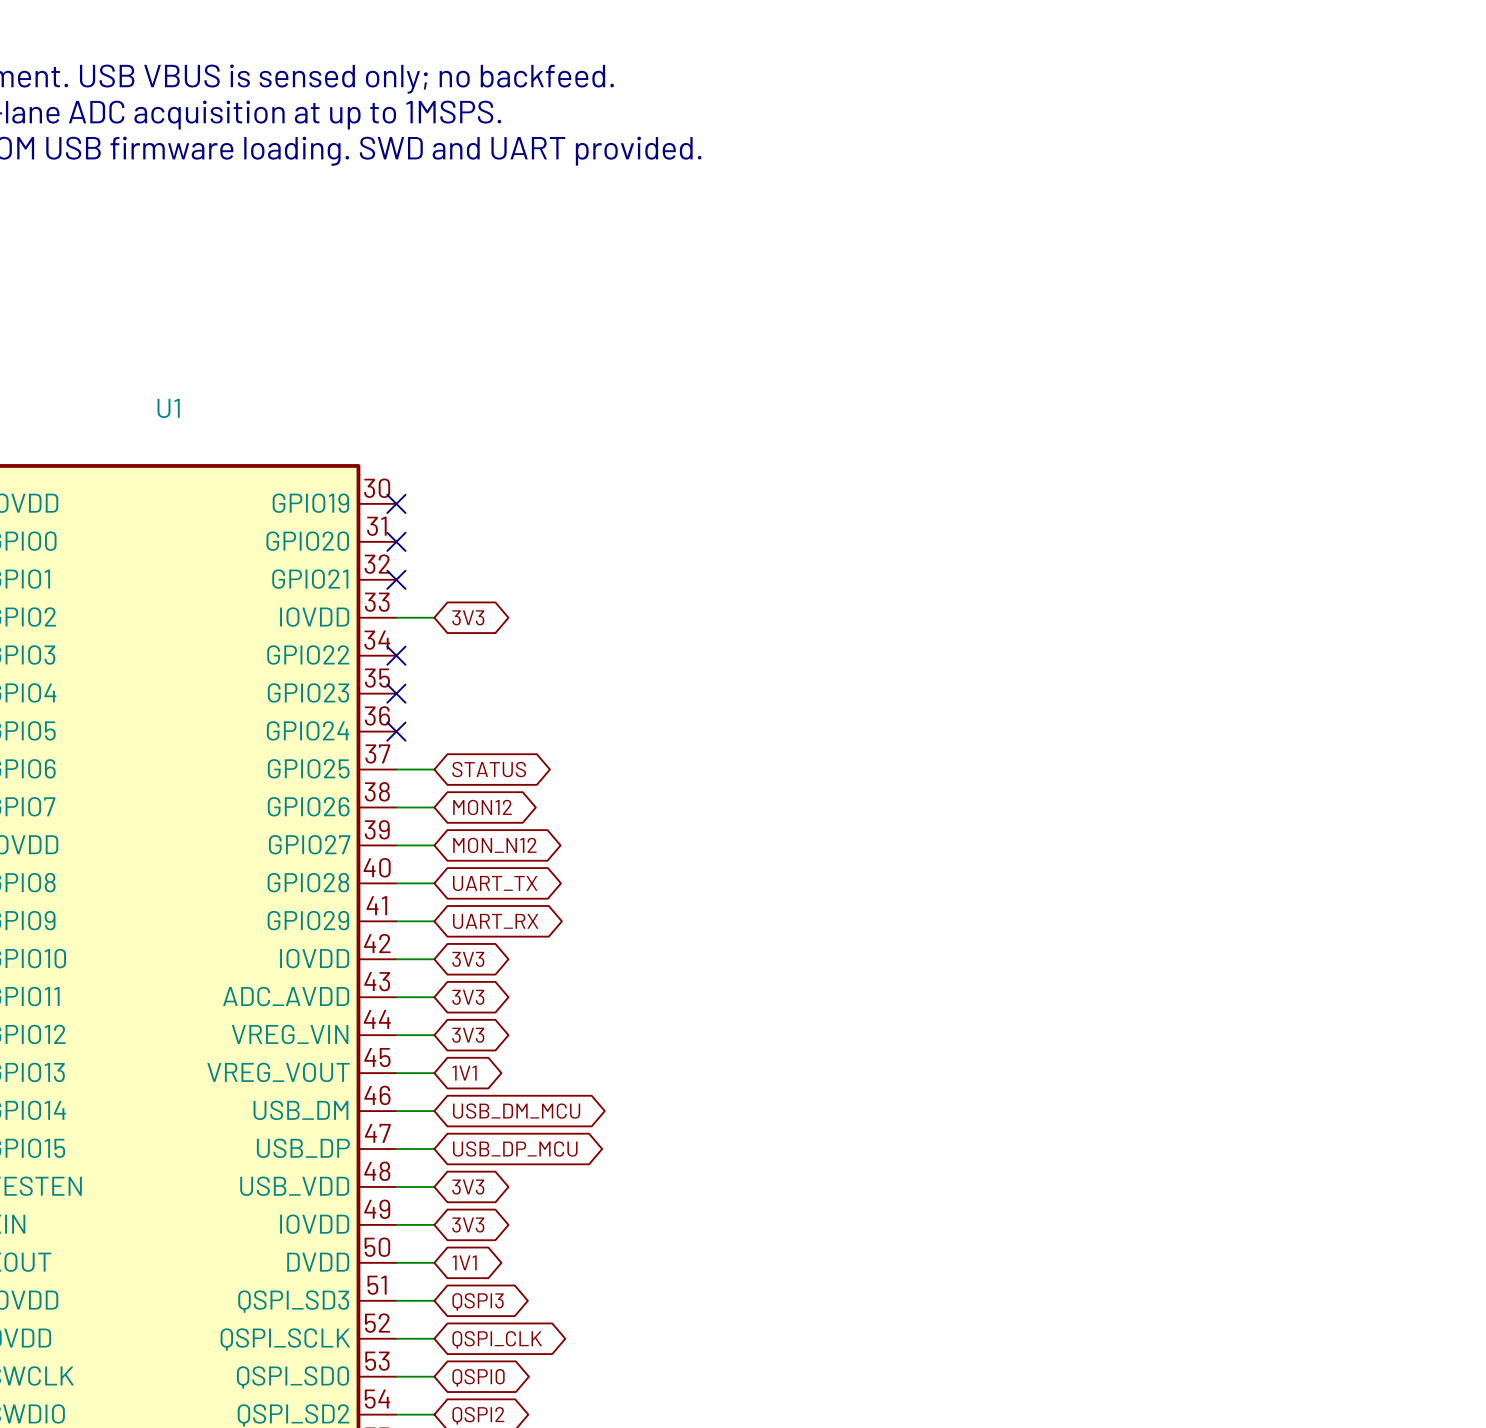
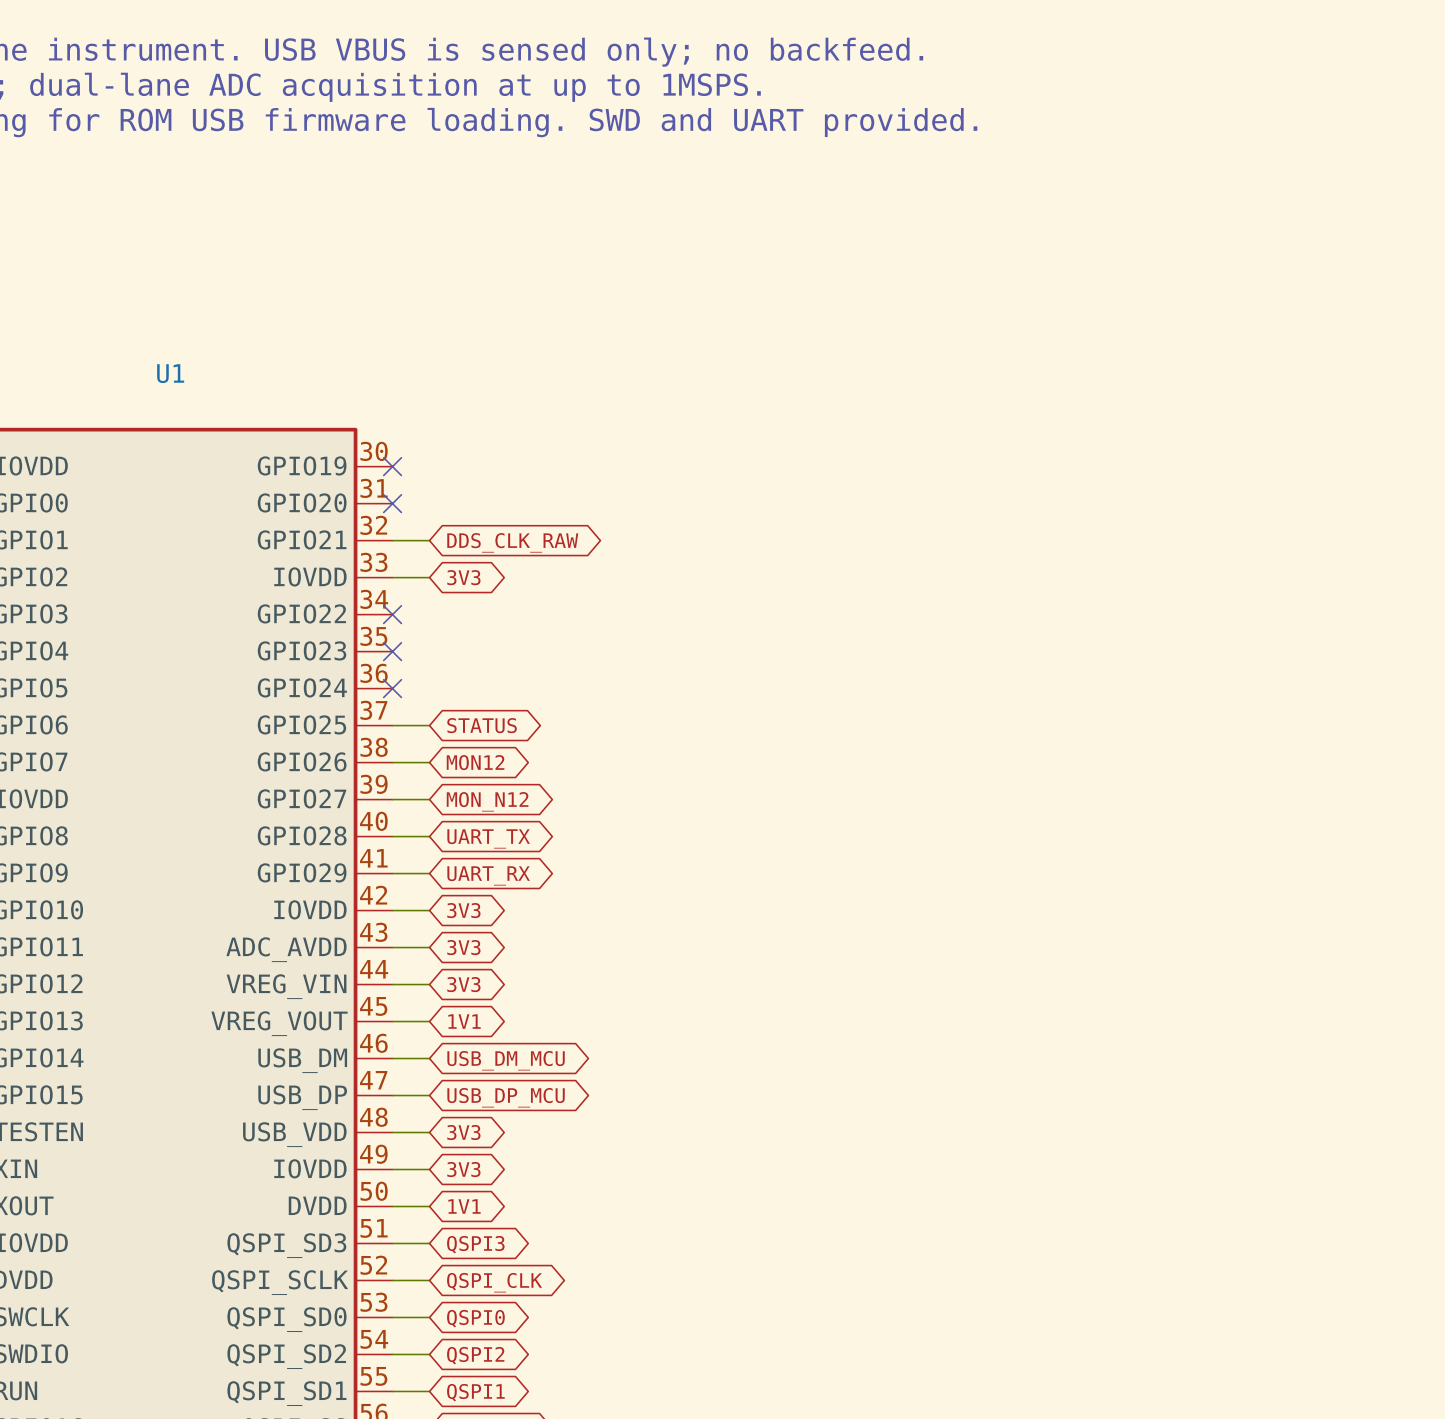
wire: none -> (392, 540) (429, 540)
no-connect mark: (396, 579) -> none
global label: none -> DDS_CLK_RAW (512, 542)

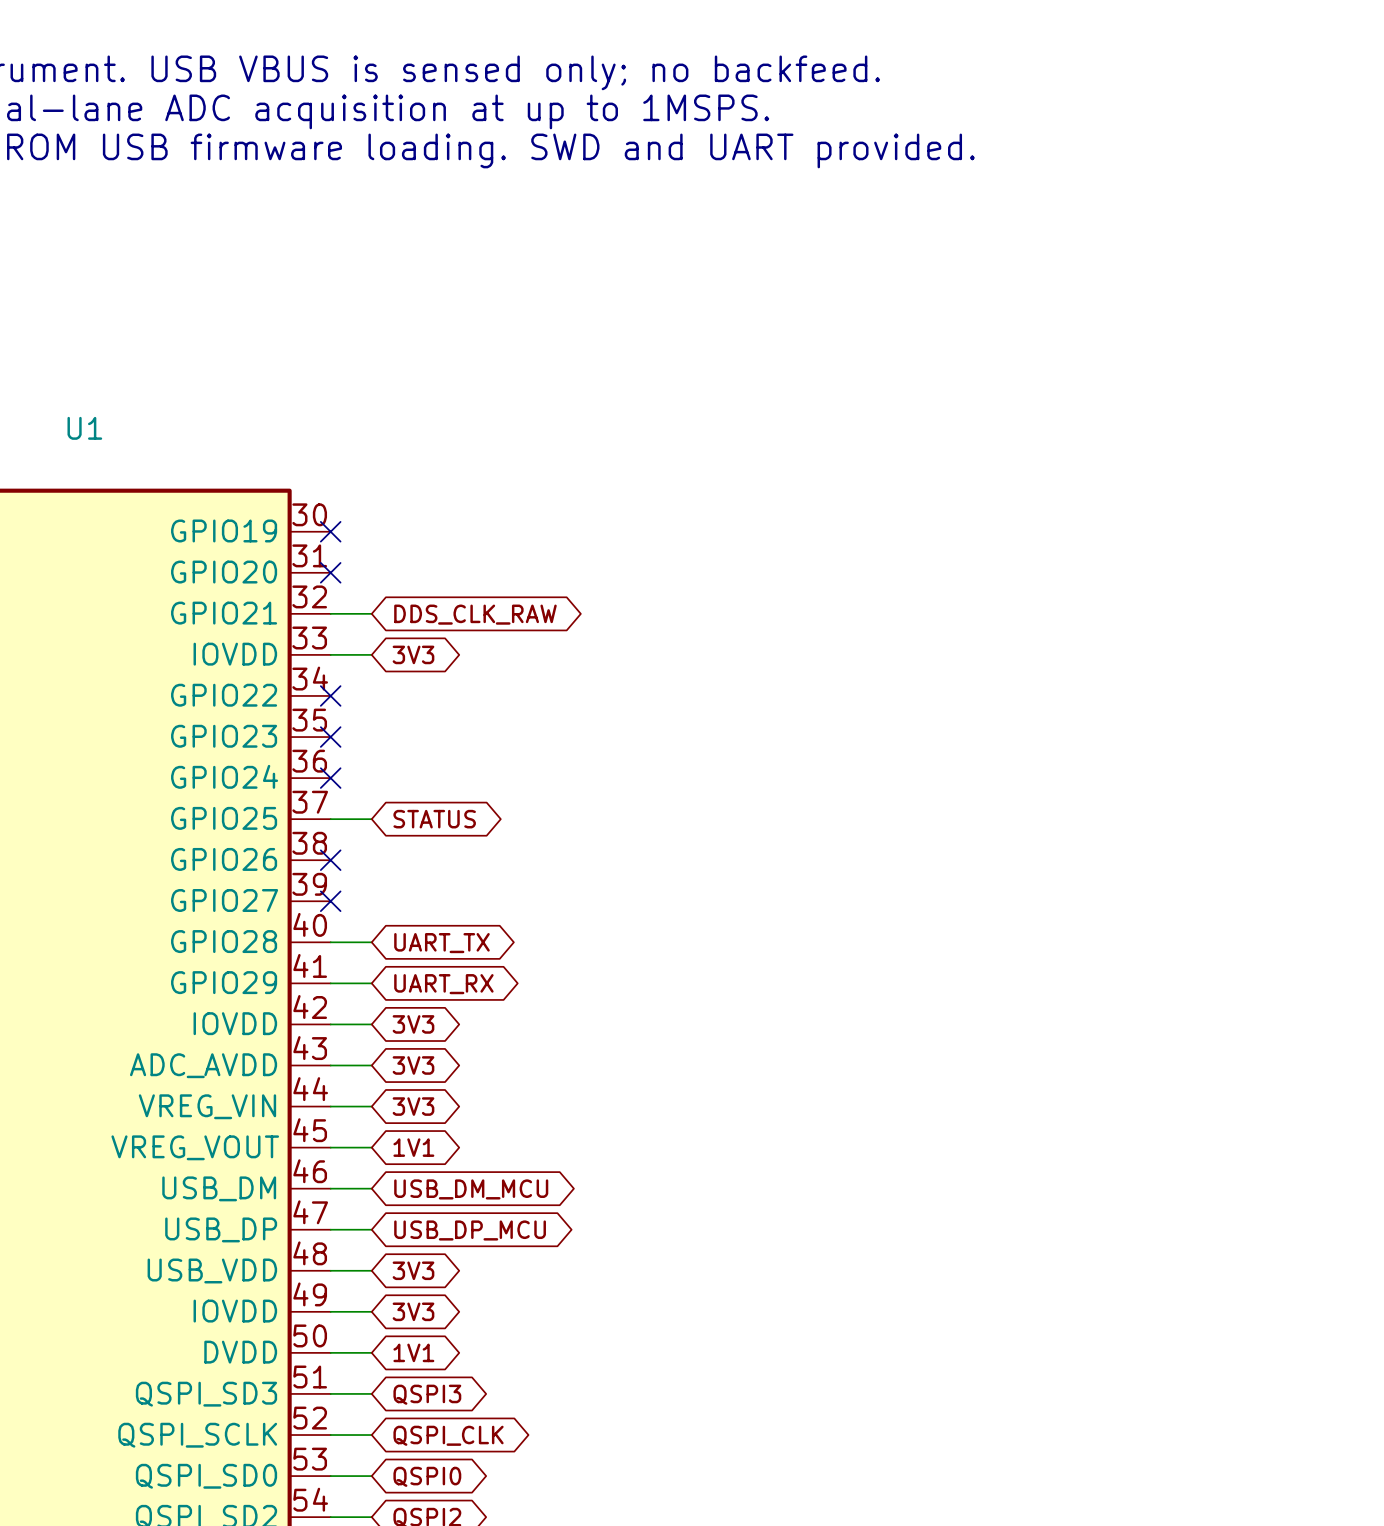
wire: (392, 762) (429, 762) -> none
no-connect mark: none -> (330, 860)
global label: MON12 (475, 762) -> none
wire: (392, 799) (429, 799) -> none
no-connect mark: none -> (330, 901)
global label: MON_N12 (487, 801) -> none

